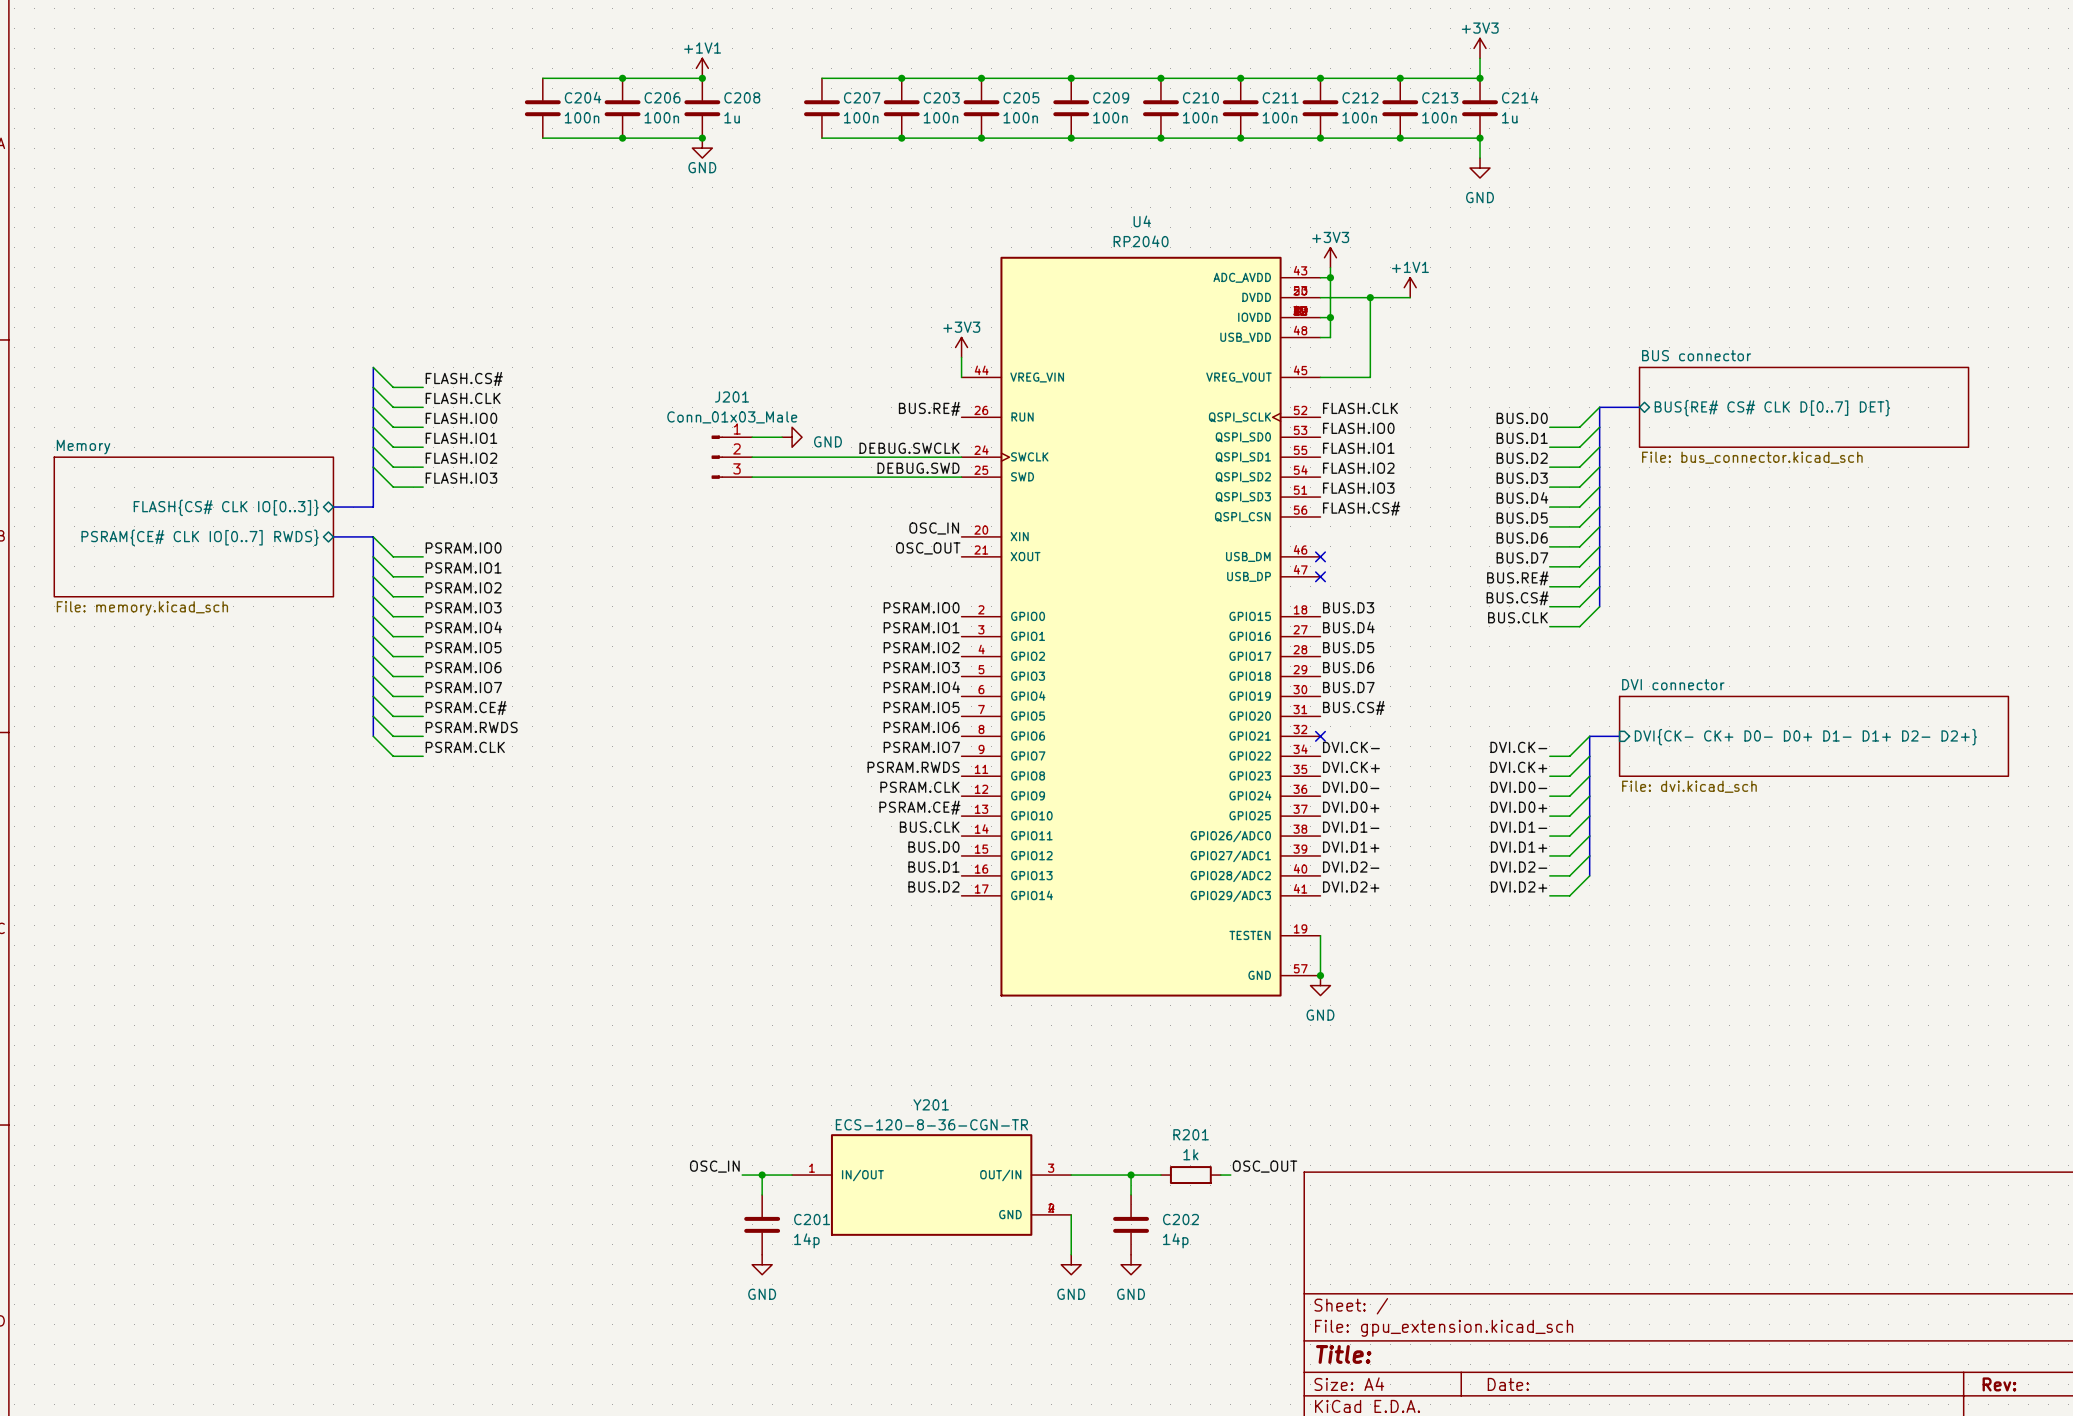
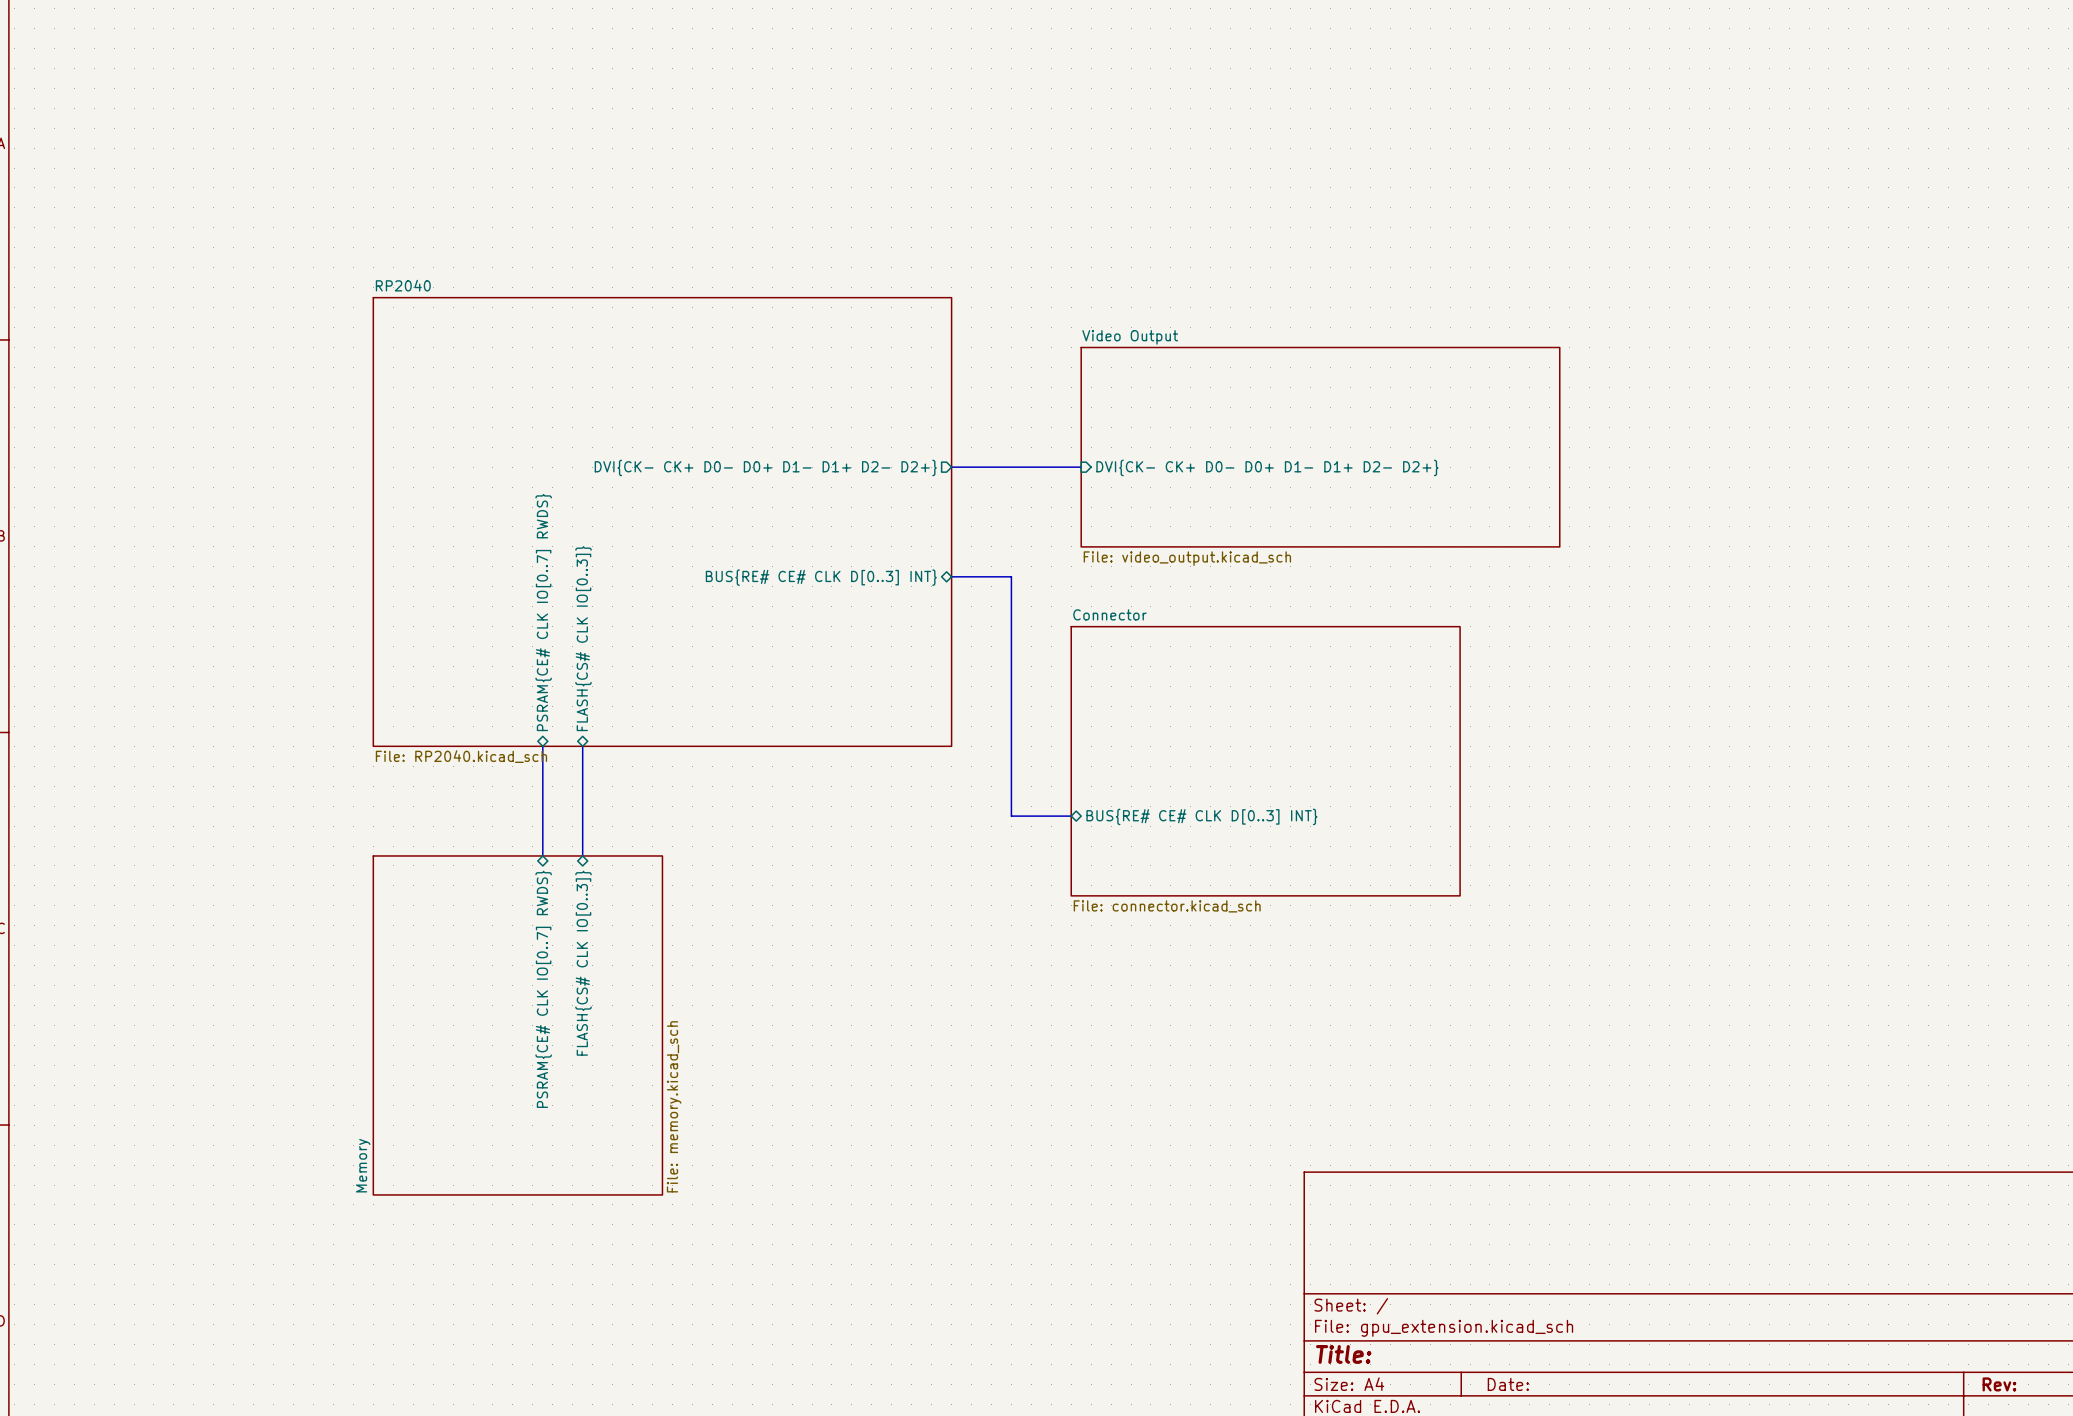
power symbol: +3V3 (1480, 48) -> none
wire: (1480, 58) (1480, 78) (821, 78) -> none
power symbol: +1V1 (702, 68) -> none
wire: (542, 78) (702, 78) -> none
junction: (622, 78) -> none
junction: (702, 78) -> none
junction: (901, 78) -> none
junction: (981, 78) -> none
junction: (1071, 78) -> none
junction: (1160, 78) -> none
junction: (1240, 78) -> none
junction: (1320, 78) -> none
junction: (1400, 78) -> none
junction: (1480, 78) -> none
C204: 100n (542, 108) -> none
C206: 100n (622, 108) -> none
C208: 1u (702, 108) -> none
C207: 100n (821, 108) -> none
C203: 100n (901, 108) -> none
C205: 100n (981, 108) -> none
C209: 100n (1071, 108) -> none
C210: 100n (1160, 108) -> none
C211: 100n (1240, 108) -> none
C212: 100n (1320, 108) -> none
C213: 100n (1400, 108) -> none
C214: 1u (1480, 108) -> none
wire: (542, 138) (702, 138) -> none
junction: (622, 138) -> none
junction: (702, 138) -> none
wire: (821, 138) (1480, 138) (1480, 158) -> none
junction: (901, 138) -> none
junction: (981, 138) -> none
junction: (1071, 138) -> none
junction: (1160, 138) -> none
junction: (1240, 138) -> none
junction: (1320, 138) -> none
junction: (1400, 138) -> none
junction: (1480, 138) -> none
power symbol: GND (702, 148) -> none
power symbol: GND (1480, 168) -> none
power symbol: +3V3 (1330, 257) -> none
wire: (1330, 267) (1330, 337) (1320, 337) -> none
wire: (1320, 277) (1330, 277) -> none
junction: (1330, 277) -> none
power symbol: +1V1 (1410, 287) -> none
wire: (1320, 297) (1410, 297) -> none
wire: (1370, 297) (1370, 377) (1320, 377) -> none
junction: (1370, 297) -> none
wire: (1320, 317) (1330, 317) -> none
junction: (1330, 317) -> none
power symbol: +3V3 (961, 347) -> none
wire: (961, 357) (961, 377) -> none
wire: (373, 367) (393, 387) (423, 387) -> none
bus: (373, 367) (373, 507) (333, 507) -> none
label: FLASH.CS# (464, 378) -> none
wire: (373, 387) (393, 407) (423, 407) -> none
label: FLASH.CLK (463, 398) -> none
wire: (373, 407) (393, 427) (423, 427) -> none
wire: (1599, 407) (1579, 427) (1549, 427) -> none
bus: (1639, 407) (1599, 407) (1599, 606) -> none
sheet BUS connector: File: bus_connector.kicad_sch (1804, 407) -> none
label: BUS.RE# (929, 408) -> none
label: FLASH.CLK (1360, 408) -> none
sheet pin: BUS{RE# CS# CLK D[0..7] DET} (1772, 408) -> none
label: FLASH.IO0 (461, 418) -> none
label: BUS.D0 (1522, 418) -> none
wire: (373, 427) (393, 447) (423, 447) -> none
wire: (1599, 427) (1579, 447) (1549, 447) -> none
label: FLASH.IO0 (1358, 428) -> none
wire: (752, 437) (782, 437) -> none
power symbol: GND (792, 437) -> none
label: FLASH.IO1 (461, 438) -> none
label: BUS.D1 (1522, 438) -> none
wire: (373, 447) (393, 467) (423, 467) -> none
sheet Video Output: none -> File: video_output.kicad_sch (1320, 447)
wire: (1599, 447) (1579, 467) (1549, 467) -> none
label: DEBUG.SWCLK (909, 448) -> none
label: FLASH.IO1 (1358, 448) -> none
J201: Conn_01x03_Male (731, 457) -> none
wire: (752, 457) (961, 457) -> none
label: FLASH.IO2 (461, 458) -> none
label: BUS.D2 (1522, 458) -> none
wire: (373, 467) (393, 487) (423, 487) -> none
sheet pin: none -> DVI{CK- CK+ D0- D0+ D1- D1+ D2- D2+} (765, 467)
bus: none -> (951, 467) (1081, 467)
sheet pin: none -> DVI{CK- CK+ D0- D0+ D1- D1+ D2- D2+} (1267, 467)
wire: (1599, 467) (1579, 487) (1549, 487) -> none
label: DEBUG.SWD (918, 468) -> none
label: FLASH.IO2 (1358, 468) -> none
wire: (752, 477) (961, 477) -> none
label: FLASH.IO3 (461, 478) -> none
label: BUS.D3 (1522, 478) -> none
wire: (1599, 487) (1579, 507) (1549, 507) -> none
label: FLASH.IO3 (1358, 488) -> none
label: BUS.D4 (1522, 497) -> none
sheet pin: FLASH{CS# CLK IO[0..3]} (226, 507) -> none
wire: (1599, 507) (1579, 526) (1549, 526) -> none
label: FLASH.CS# (1361, 508) -> none
label: BUS.D5 (1522, 518) -> none
sheet RP2040: none -> File: RP2040.kicad_sch (662, 521)
sheet Memory: File: memory.kicad_sch (193, 526) -> none
wire: (1599, 526) (1579, 546) (1549, 546) -> none
label: OSC_IN (934, 528) -> none
bus: (333, 536) (373, 536) (373, 736) -> none
wire: (373, 536) (393, 556) (423, 556) -> none
sheet pin: PSRAM{CE# CLK IO[0..7] RWDS} (200, 537) -> none
label: BUS.D6 (1522, 538) -> none
wire: (1599, 546) (1579, 566) (1549, 566) -> none
label: PSRAM.IO0 (463, 547) -> none
label: OSC_OUT (928, 548) -> none
wire: (373, 556) (393, 576) (423, 576) -> none
no-connect mark: (1320, 556) -> none
label: BUS.D7 (1522, 557) -> none
wire: (1599, 566) (1579, 586) (1549, 586) -> none
label: PSRAM.IO1 (463, 567) -> none
wire: (373, 576) (393, 596) (423, 596) -> none
bus: none -> (951, 576) (1011, 576) (1011, 816) (1071, 816)
no-connect mark: (1320, 576) -> none
sheet pin: none -> BUS{RE# CE# CLK D[0..3] INT} (821, 577)
label: BUS.RE# (1517, 578) -> none
wire: (1599, 586) (1579, 606) (1549, 606) -> none
label: PSRAM.IO2 (463, 587) -> none
wire: (373, 596) (393, 616) (423, 616) -> none
label: BUS.CS# (1517, 598) -> none
wire: (1599, 606) (1579, 626) (1549, 626) -> none
label: PSRAM.IO3 (463, 607) -> none
label: PSRAM.IO0 (921, 607) -> none
label: BUS.D3 (1348, 607) -> none
sheet pin: none -> PSRAM{CE# CLK IO[0..7] RWDS} (543, 612)
wire: (373, 616) (393, 636) (423, 636) -> none
label: BUS.CLK (1517, 617) -> none
U4: RP2040 (1141, 626) -> none
label: PSRAM.IO4 (463, 627) -> none
label: PSRAM.IO1 (921, 627) -> none
label: BUS.D4 (1348, 627) -> none
wire: (373, 636) (393, 656) (423, 656) -> none
sheet pin: none -> FLASH{CS# CLK IO[0..3]} (583, 638)
label: PSRAM.IO5 (463, 647) -> none
label: PSRAM.IO2 (921, 647) -> none
label: BUS.D5 (1348, 647) -> none
wire: (373, 656) (393, 676) (423, 676) -> none
label: PSRAM.IO6 (463, 667) -> none
label: PSRAM.IO3 (921, 667) -> none
label: BUS.D6 (1348, 667) -> none
wire: (373, 676) (393, 696) (423, 696) -> none
label: PSRAM.IO7 (463, 687) -> none
label: PSRAM.IO4 (921, 687) -> none
label: BUS.D7 (1348, 687) -> none
wire: (373, 696) (393, 716) (423, 716) -> none
label: PSRAM.CE# (466, 707) -> none
label: PSRAM.IO5 (921, 707) -> none
label: BUS.CS# (1354, 707) -> none
wire: (373, 716) (393, 736) (423, 736) -> none
label: PSRAM.RWDS (471, 727) -> none
label: PSRAM.IO6 (921, 727) -> none
wire: (373, 736) (393, 756) (423, 756) -> none
no-connect mark: (1320, 736) -> none
wire: (1589, 736) (1569, 756) (1549, 756) -> none
bus: (1619, 736) (1589, 736) (1589, 875) -> none
sheet DVI connector: File: dvi.kicad_sch (1814, 736) -> none
sheet pin: DVI{CK- CK+ D0- D0+ D1- D1+ D2- D2+} (1805, 737) -> none
bus: none -> (542, 746) (542, 855)
bus: none -> (582, 746) (582, 855)
label: PSRAM.CLK (465, 747) -> none
label: PSRAM.IO7 (921, 747) -> none
label: DVI.CK- (1351, 747) -> none
label: DVI.CK- (1518, 747) -> none
wire: (1589, 756) (1569, 776) (1549, 776) -> none
sheet Connector: none -> File: connector.kicad_sch (1265, 761)
label: PSRAM.RWDS (913, 767) -> none
label: DVI.CK+ (1351, 767) -> none
label: DVI.CK+ (1518, 767) -> none
wire: (1589, 776) (1569, 796) (1549, 796) -> none
label: PSRAM.CLK (919, 787) -> none
label: DVI.D0- (1351, 787) -> none
label: DVI.D0- (1519, 787) -> none
wire: (1589, 796) (1569, 816) (1549, 816) -> none
label: PSRAM.CE# (919, 807) -> none
label: DVI.D0+ (1351, 807) -> none
label: DVI.D0+ (1519, 807) -> none
sheet pin: none -> BUS{RE# CE# CLK D[0..3] INT} (1201, 816)
wire: (1589, 816) (1569, 836) (1549, 836) -> none
label: BUS.CLK (929, 827) -> none
label: DVI.D1- (1351, 827) -> none
label: DVI.D1- (1519, 827) -> none
wire: (1589, 836) (1569, 855) (1549, 855) -> none
label: BUS.D0 (933, 847) -> none
label: DVI.D1+ (1351, 847) -> none
label: DVI.D1+ (1519, 847) -> none
wire: (1589, 855) (1569, 875) (1549, 875) -> none
label: BUS.D1 (933, 867) -> none
label: DVI.D2- (1351, 867) -> none
label: DVI.D2- (1519, 867) -> none
wire: (1589, 875) (1569, 895) (1549, 895) -> none
label: BUS.D2 (933, 886) -> none
label: DVI.D2+ (1351, 886) -> none
label: DVI.D2+ (1519, 886) -> none
wire: (1320, 935) (1320, 975) -> none
sheet pin: none -> FLASH{CS# CLK IO[0..3]} (583, 963)
junction: (1320, 975) -> none
power symbol: GND (1320, 985) -> none
sheet pin: none -> PSRAM{CE# CLK IO[0..7] RWDS} (543, 989)
sheet Memory: none -> File: memory.kicad_sch (517, 1025)
label: OSC_IN (714, 1166) -> none
label: OSC_OUT (1265, 1166) -> none
wire: (742, 1175) (792, 1175) -> none
wire: (762, 1175) (762, 1194) -> none
junction: (762, 1175) -> none
wire: (1071, 1175) (1160, 1175) -> none
wire: (1131, 1175) (1131, 1194) -> none
junction: (1131, 1175) -> none
R201: 1k (1190, 1175) -> none
wire: (1220, 1175) (1230, 1175) -> none
Y201: ECS-120-8-36-CGN-TR (931, 1185) -> none
wire: (1071, 1214) (1071, 1254) -> none
C201: 14p (762, 1224) -> none
C202: 14p (1131, 1224) -> none
power symbol: GND (762, 1264) -> none
power symbol: GND (1071, 1264) -> none
power symbol: GND (1131, 1264) -> none

